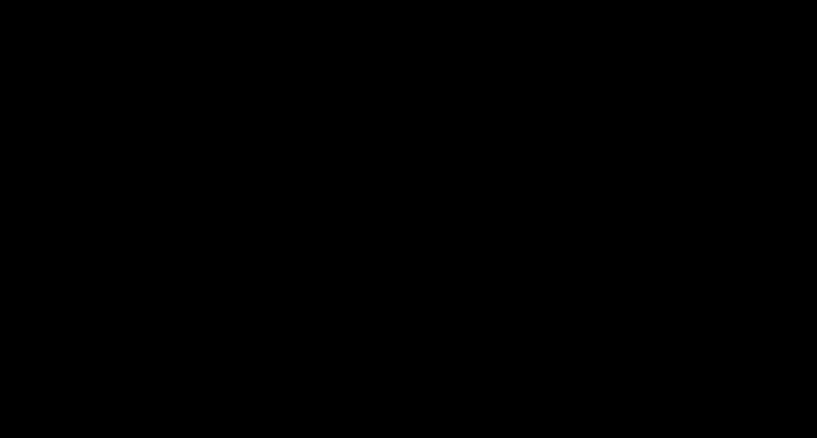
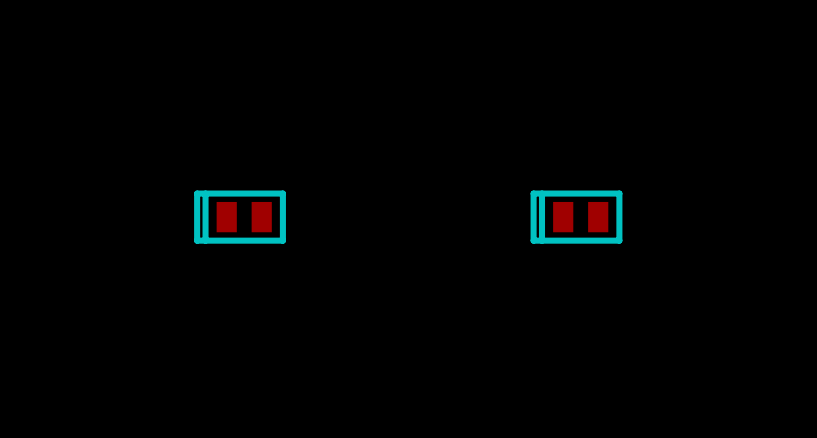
part: none -> (240, 217)
part: none -> (576, 217)

